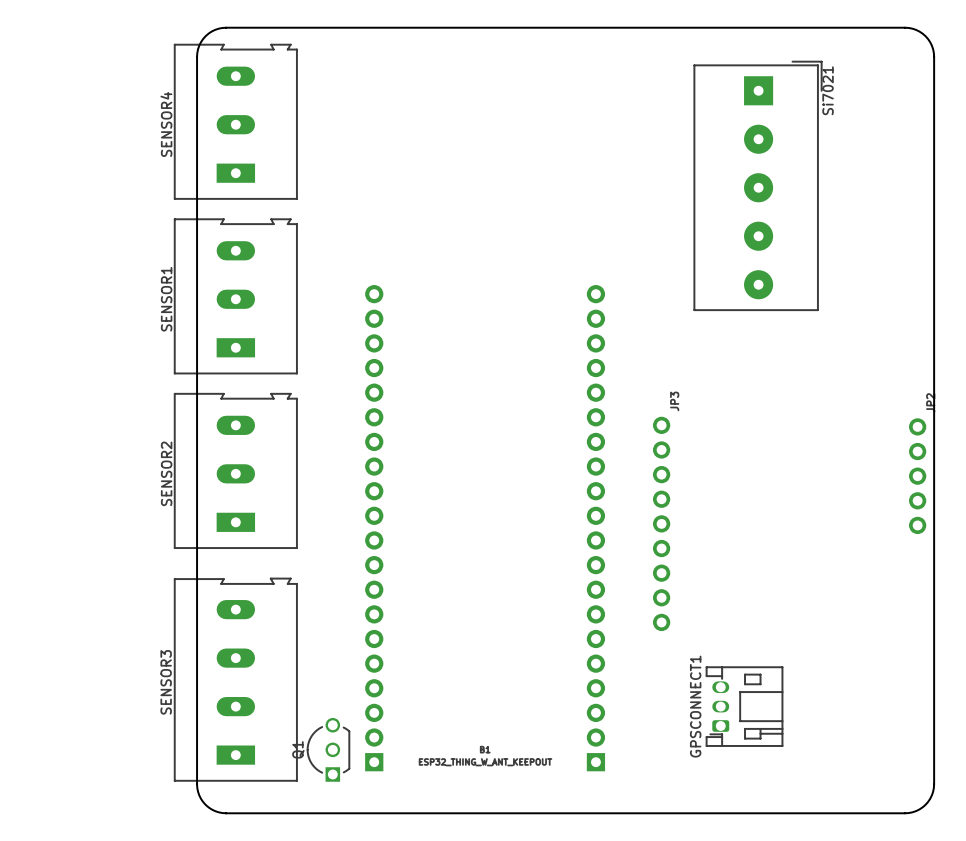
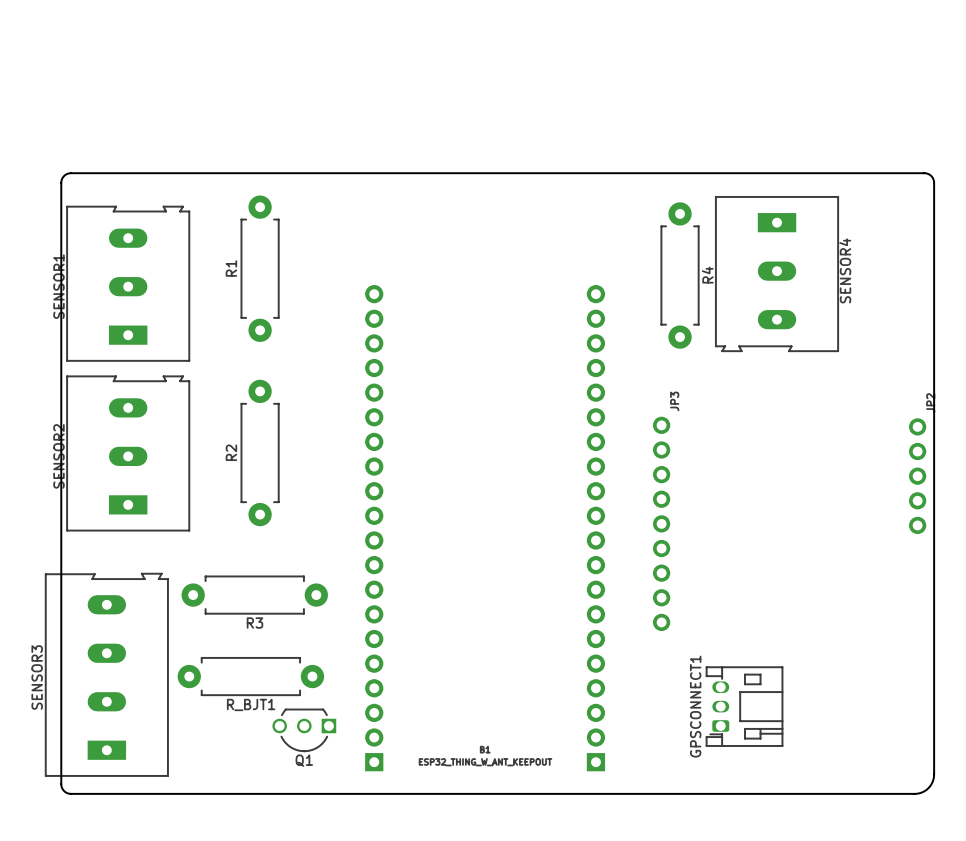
SENSOR4 rotation: 0° (235, 121) -> 180° (777, 274)
SENSOR4 position: (235, 121) -> (777, 274)
board edge: (934, 182) (933, 53) (925, 36) (908, 27) (226, 27) (208, 33) (200, 42) (197, 53) (197, 784) (199, 795) (205, 804) (215, 811) (226, 813) (905, 813) (916, 811) (928, 801) (933, 791) (934, 774) -> (934, 182) (931, 176) (924, 173) (70, 173) (65, 175) (61, 182) (61, 784) (64, 791) (70, 793) (914, 793) (928, 788) (934, 774)
Si7021: (758, 185) -> none
R1: none -> (260, 268)
R4: none -> (680, 275)
SENSOR1 position: (235, 296) -> (128, 283)
R2: none -> (260, 452)
SENSOR2 position: (235, 470) -> (128, 453)
R3: none -> (254, 595)
R_BJT1: none -> (250, 676)
SENSOR3 position: (235, 679) -> (106, 674)
Q1 rotation: 0° (328, 749) -> 90° counterclockwise (304, 730)

